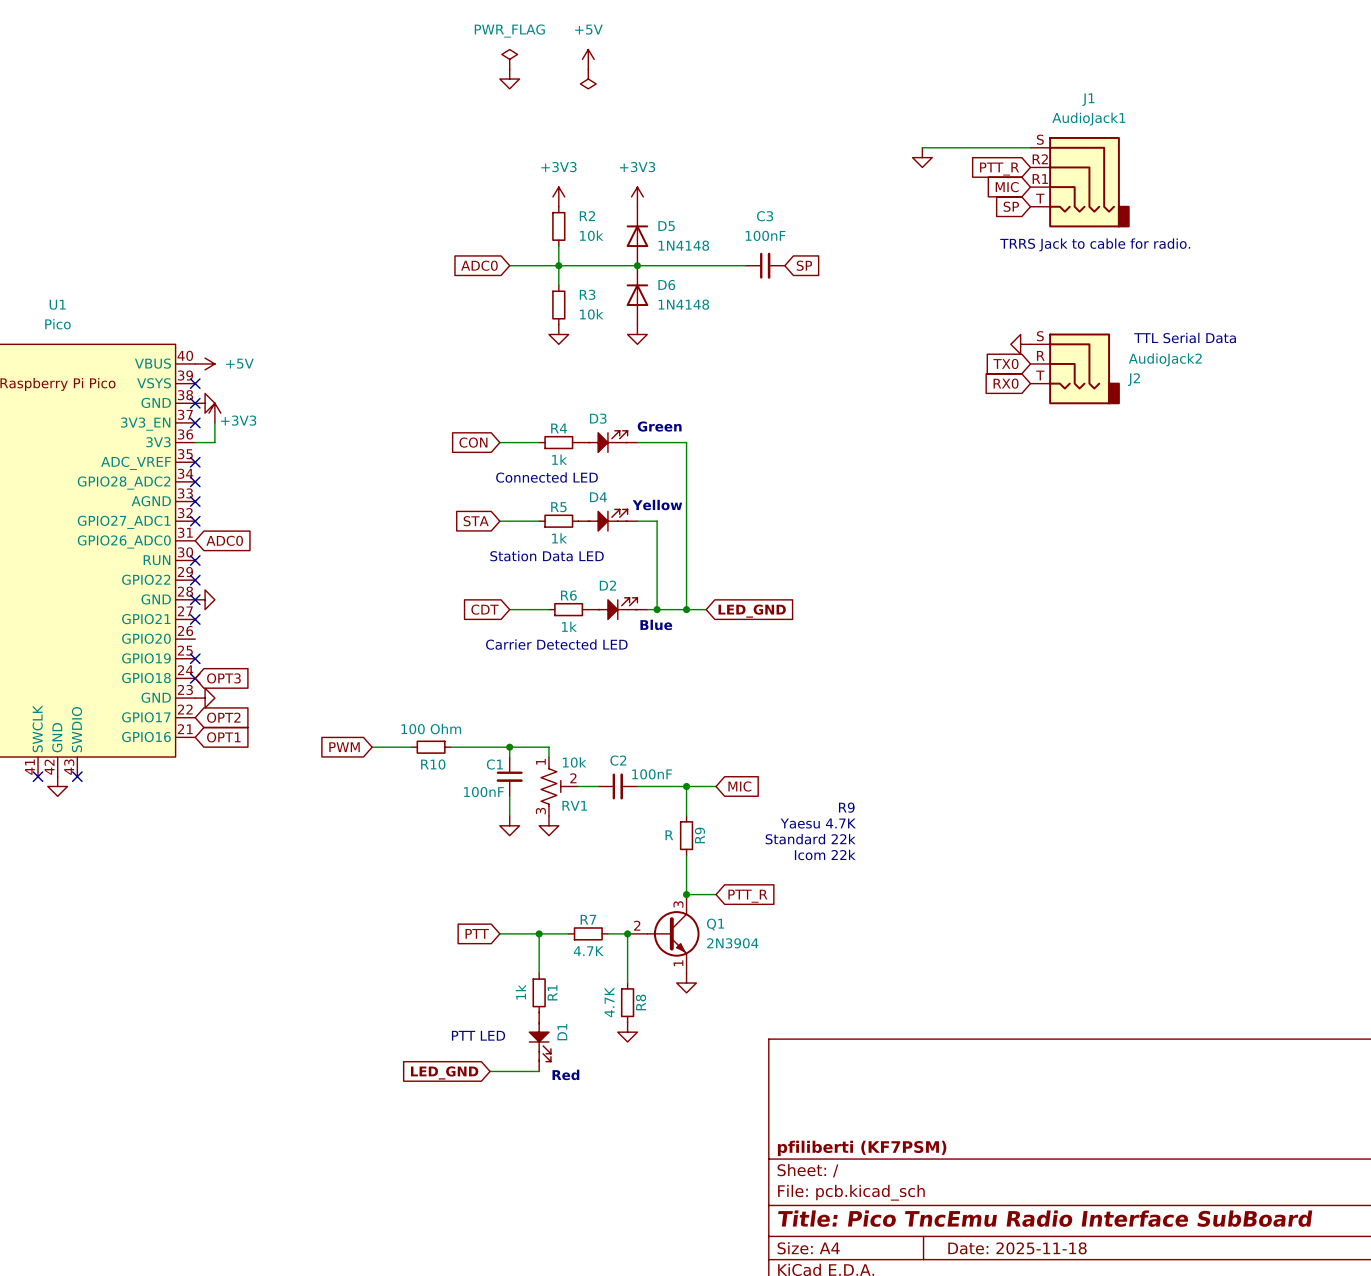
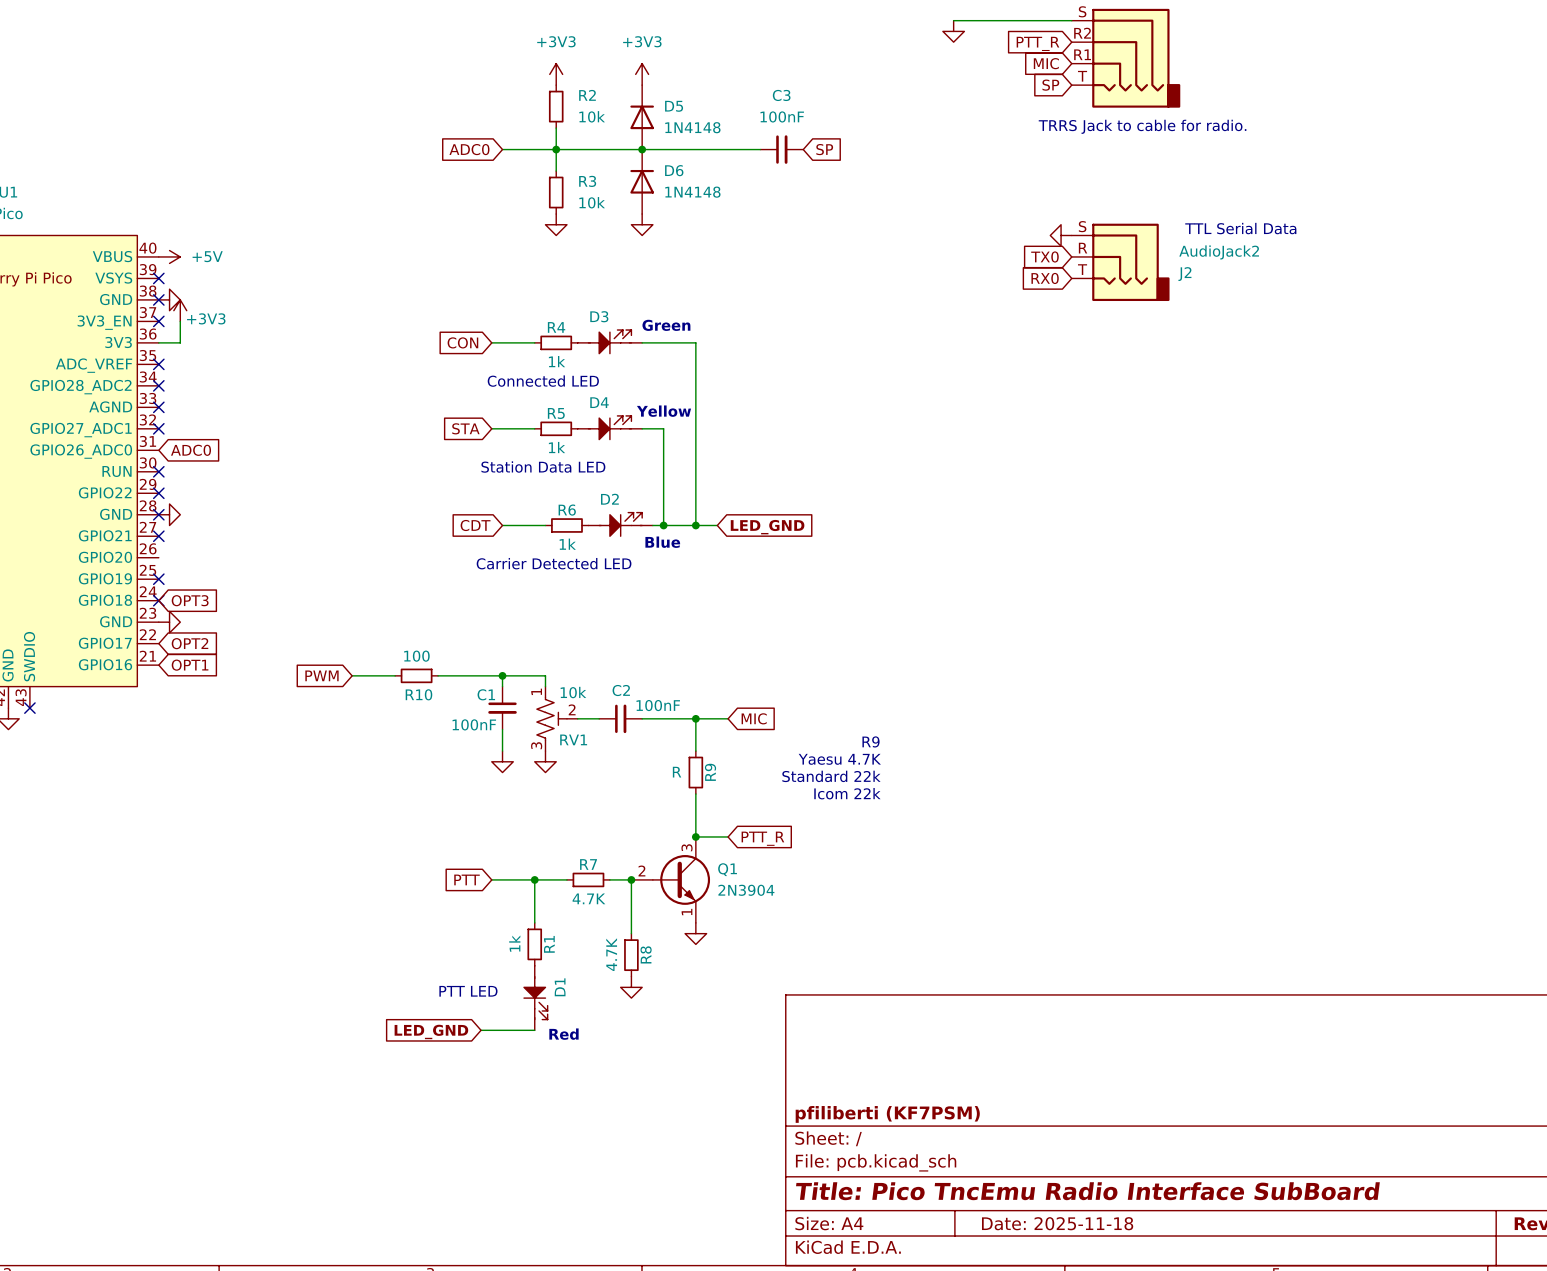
R10 value: 100 Ohm (431, 729) -> 100 (416, 656)

